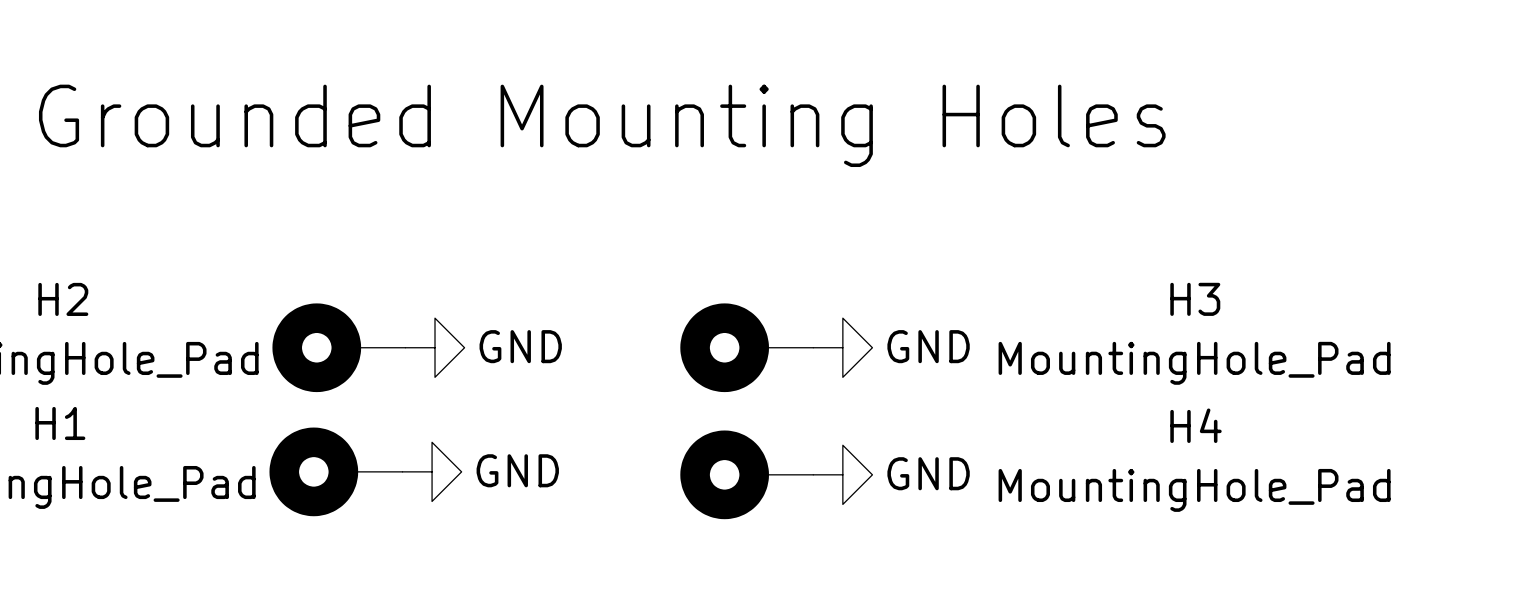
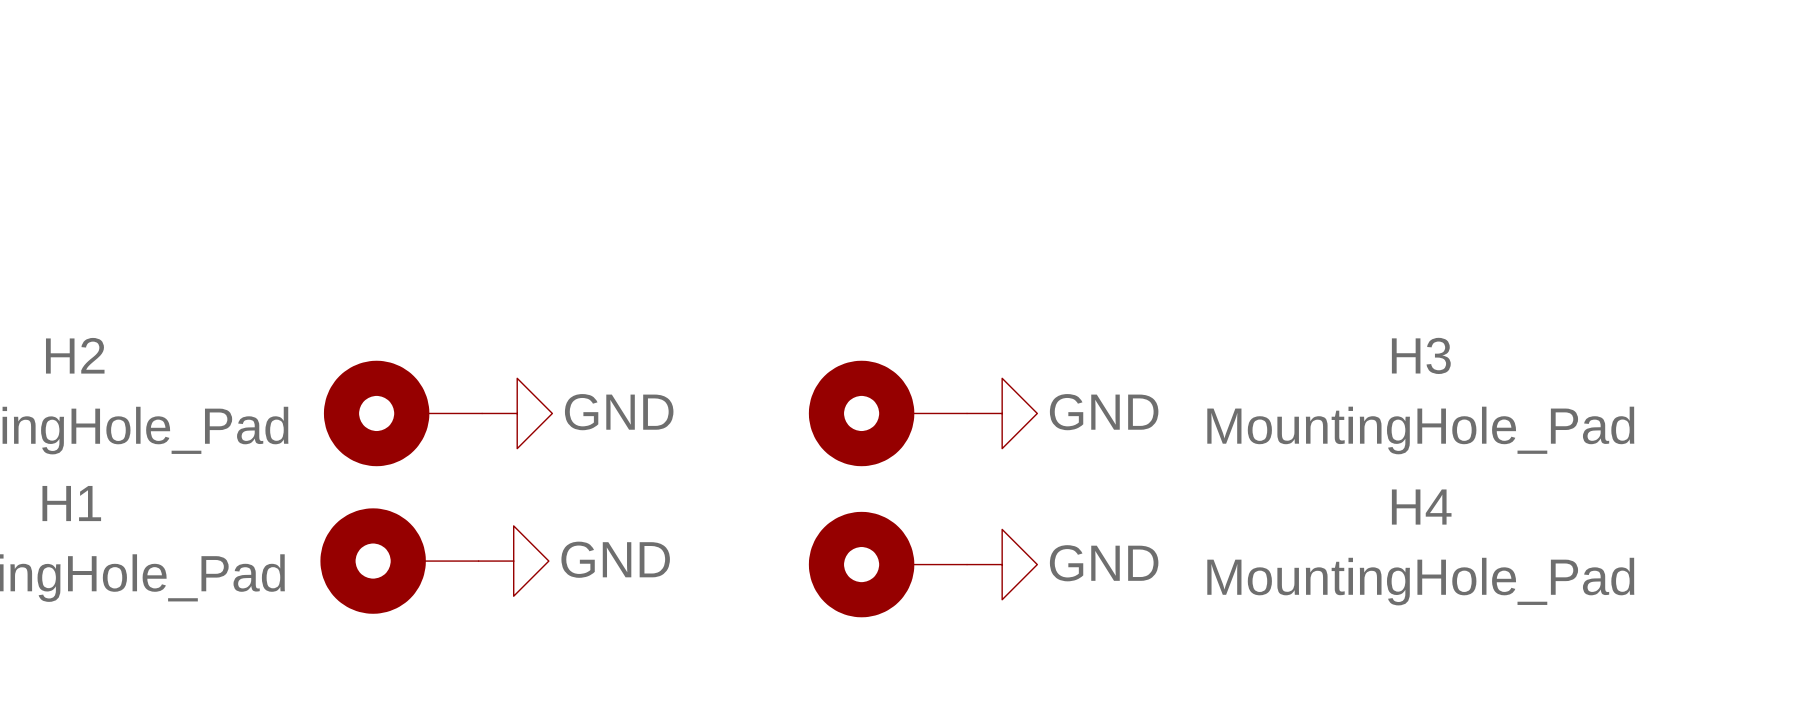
text: Grounded Mounting Holes (602, 125) -> none

